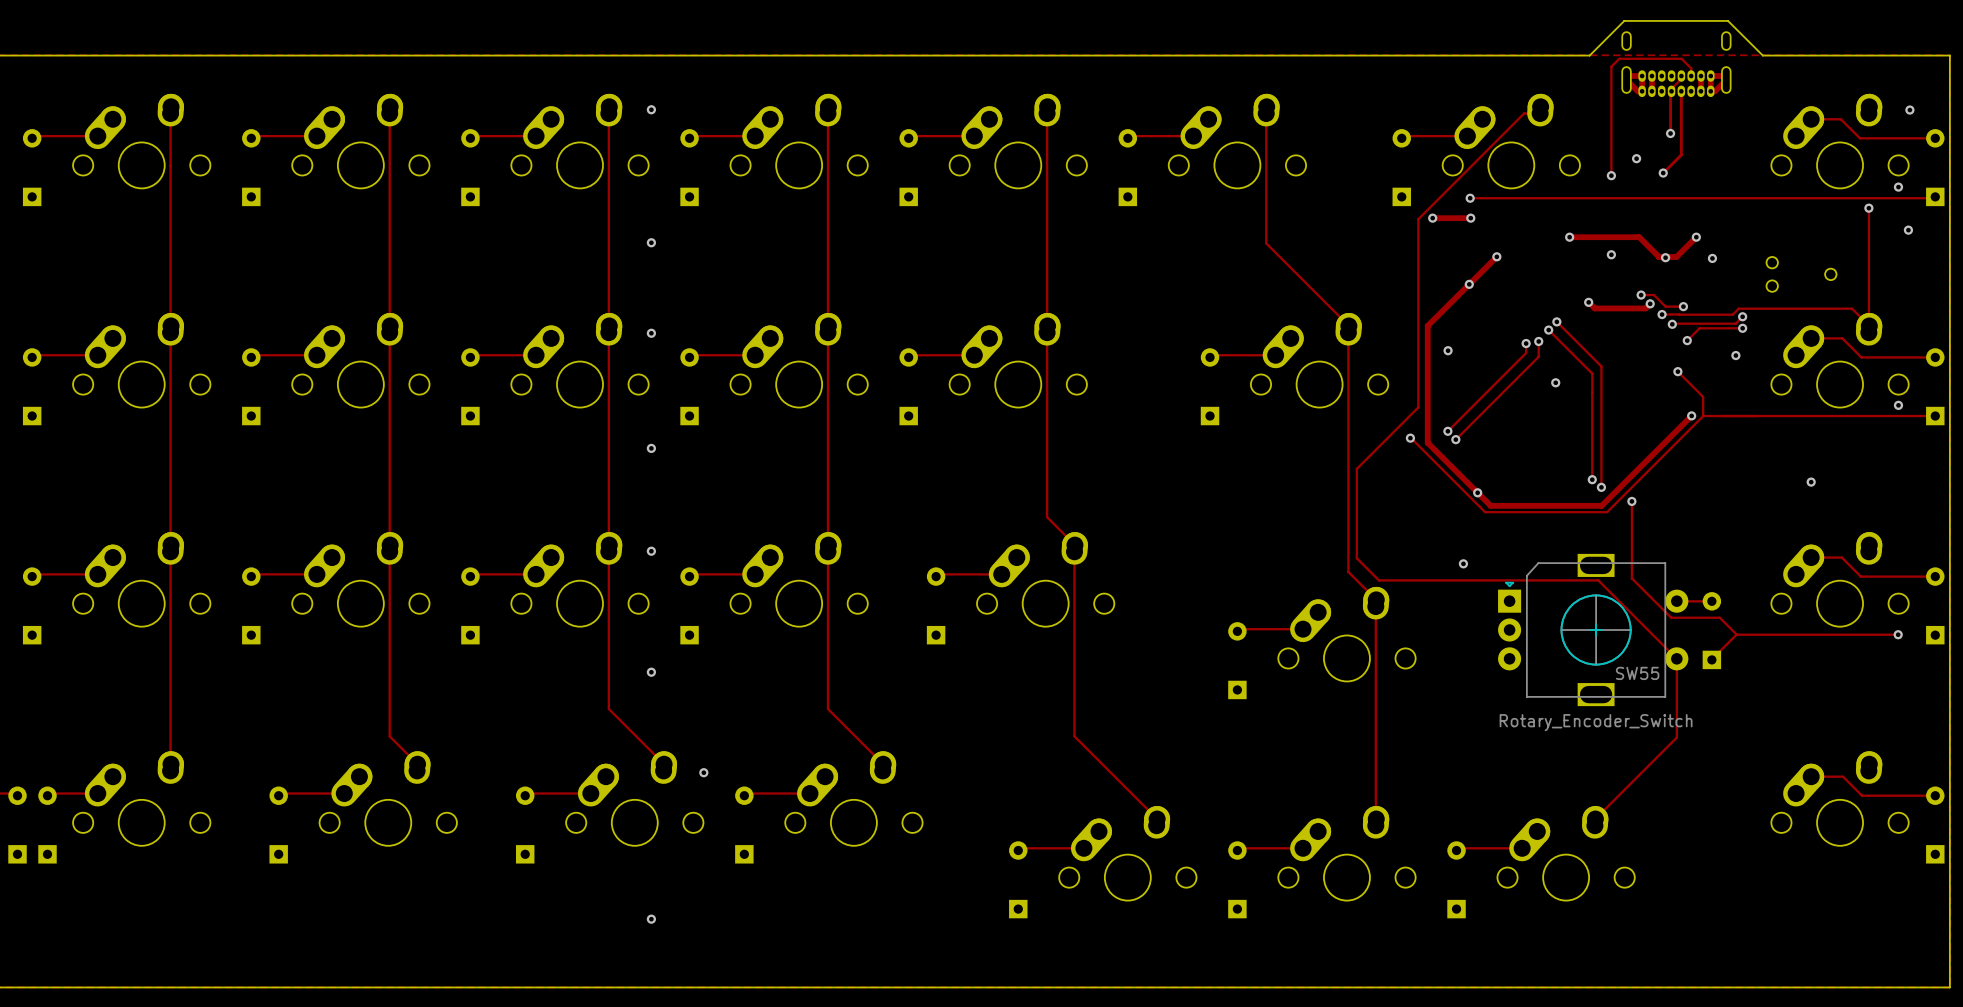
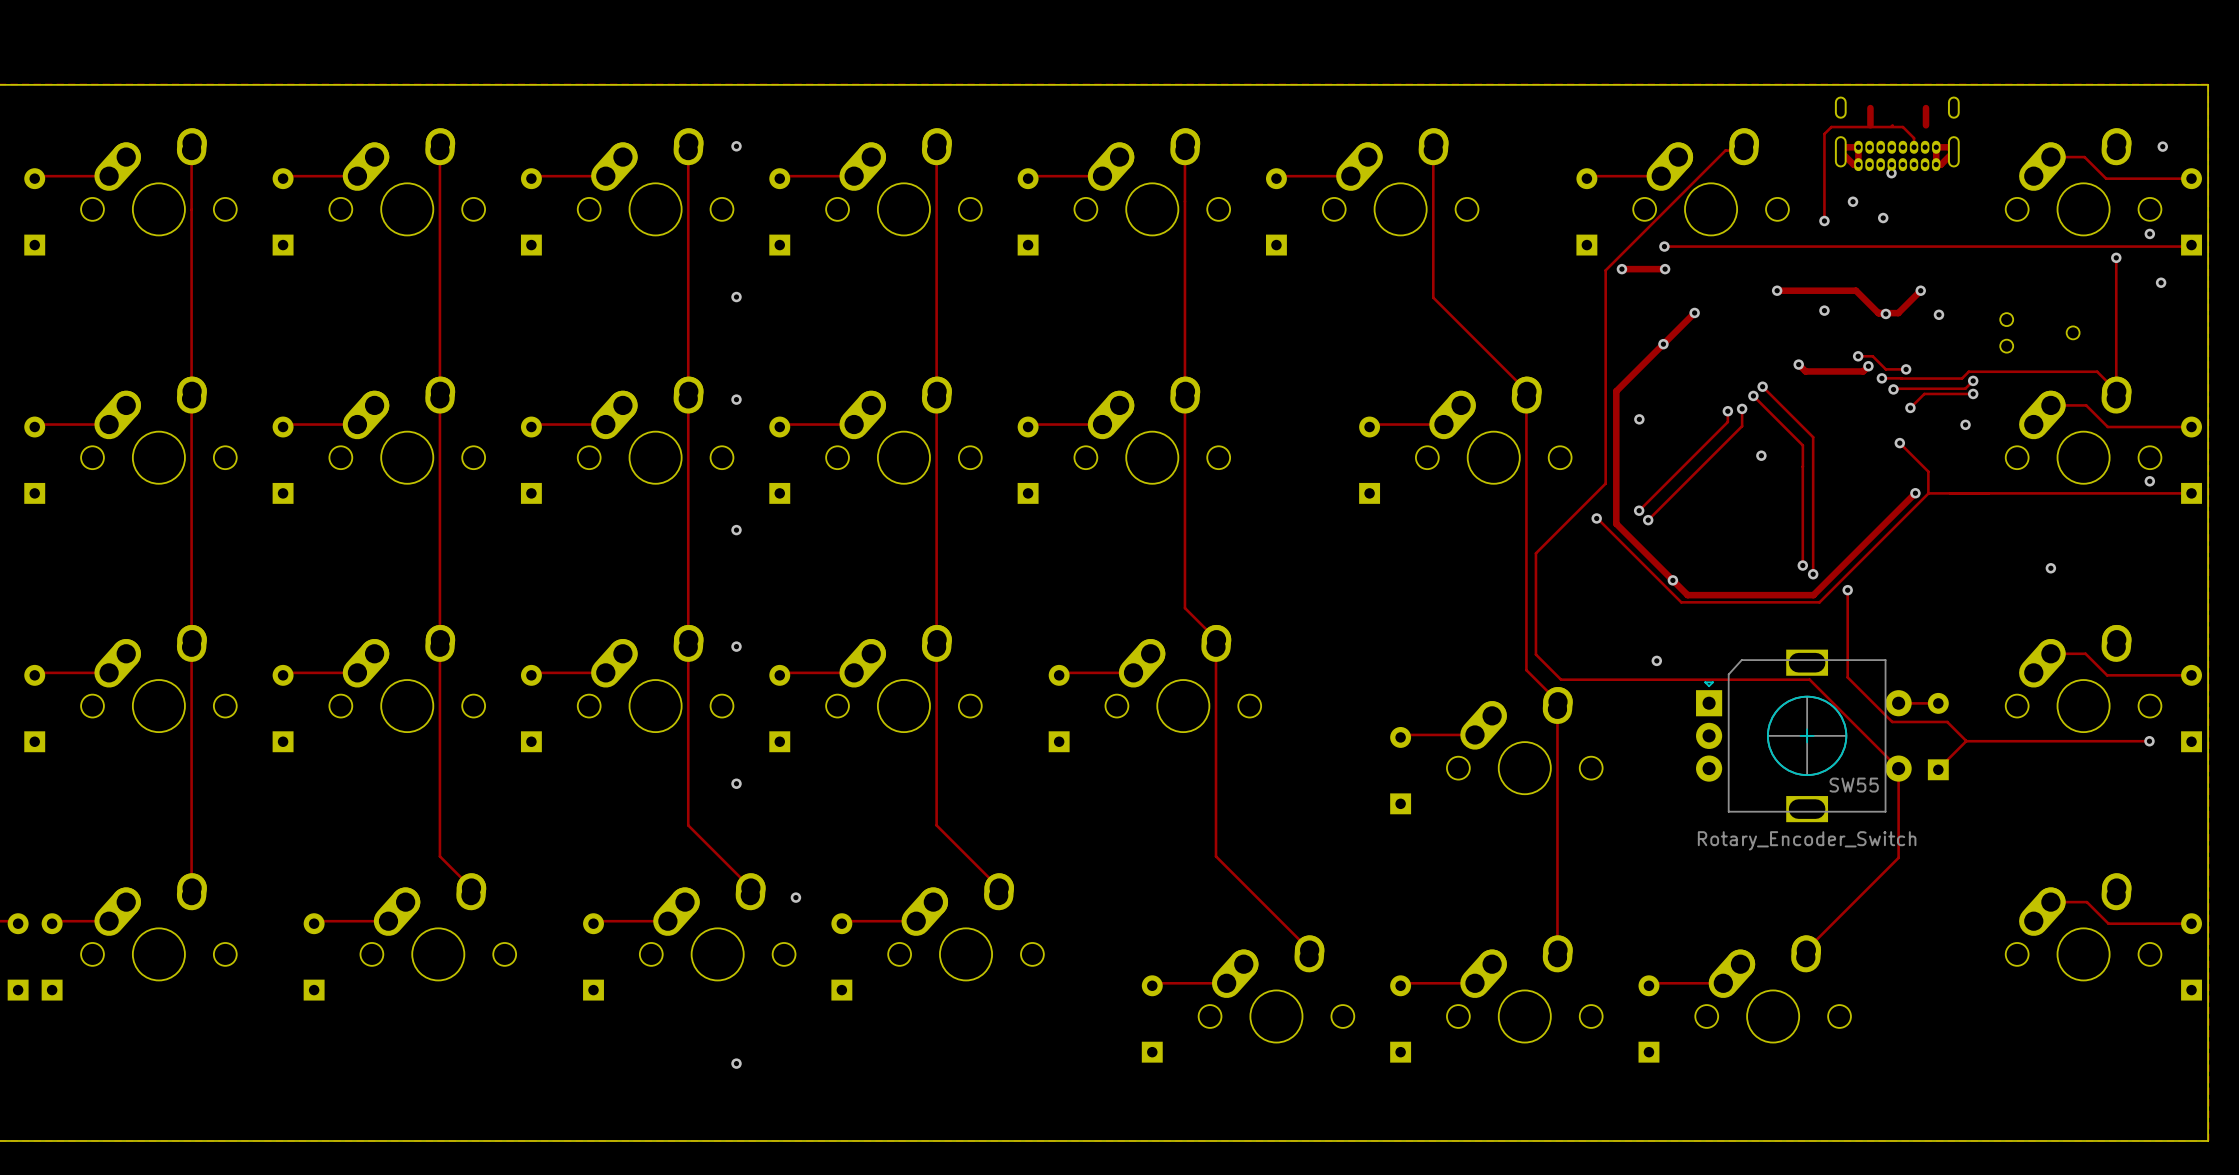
board edge: (1589, 55) (1624, 20) (1728, 20) (1762, 55) -> (1799, 84) (1996, 84)
part position: (1676, 64) -> (1897, 133)
track: (1630, 76) (1642, 76) (1642, 91) (1637, 91) (1626, 80) (1630, 76) -> (1845, 147) (1858, 147) (1858, 164) (1853, 164) (1840, 151) (1845, 147)
track: (1681, 76) (1681, 79) (1670, 92) (1670, 133) -> none
track: (1691, 76) (1691, 68) (1681, 58) (1619, 58) (1611, 66) (1611, 98) -> (1914, 147) (1914, 138) (1902, 127) (1831, 127) (1824, 134)
track: (1681, 91) (1681, 154) (1663, 173) -> none
track: (1710, 91) (1710, 76) (1722, 76) (1726, 80) (1715, 91) (1710, 91) -> (1936, 164) (1936, 147) (1949, 147) (1953, 151) (1941, 164) (1936, 164)

